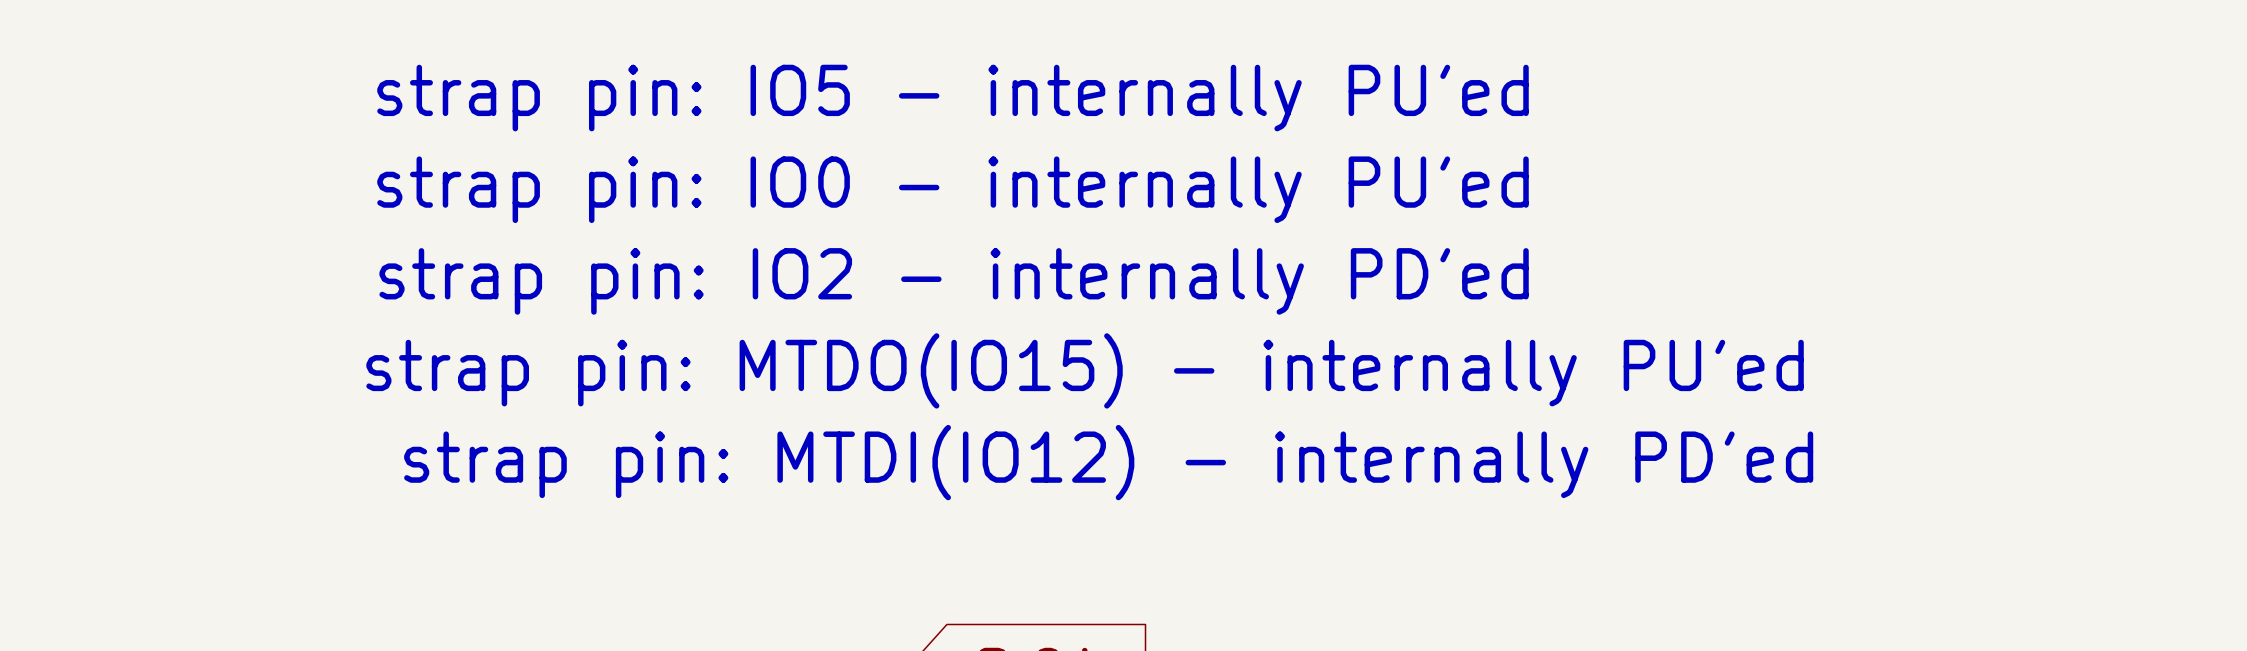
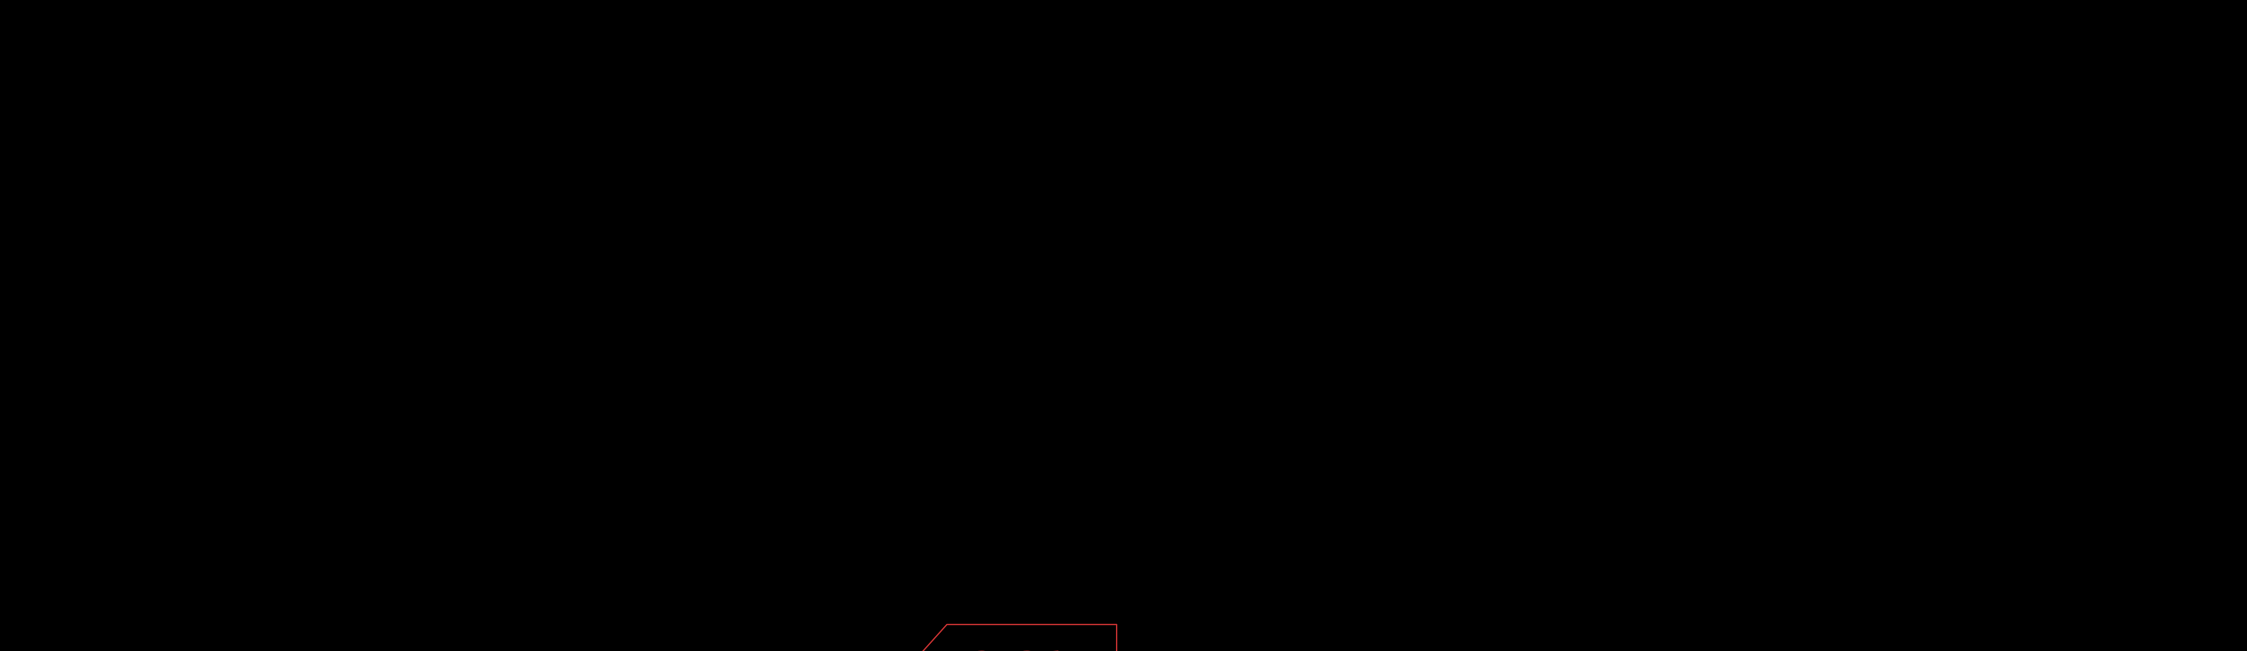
text: strap pin: IO5 - internally PU'ed (952, 98) -> none
text: strap pin: IO0 - internally PU'ed (952, 189) -> none
text: strap pin: IO2 - internally PD'ed (954, 281) -> none
text: strap pin: MTDO(IO15) - internally PU'ed (1085, 370) -> none
text: strap pin: MTDI(IO12) - internally PD'ed (1108, 462) -> none

